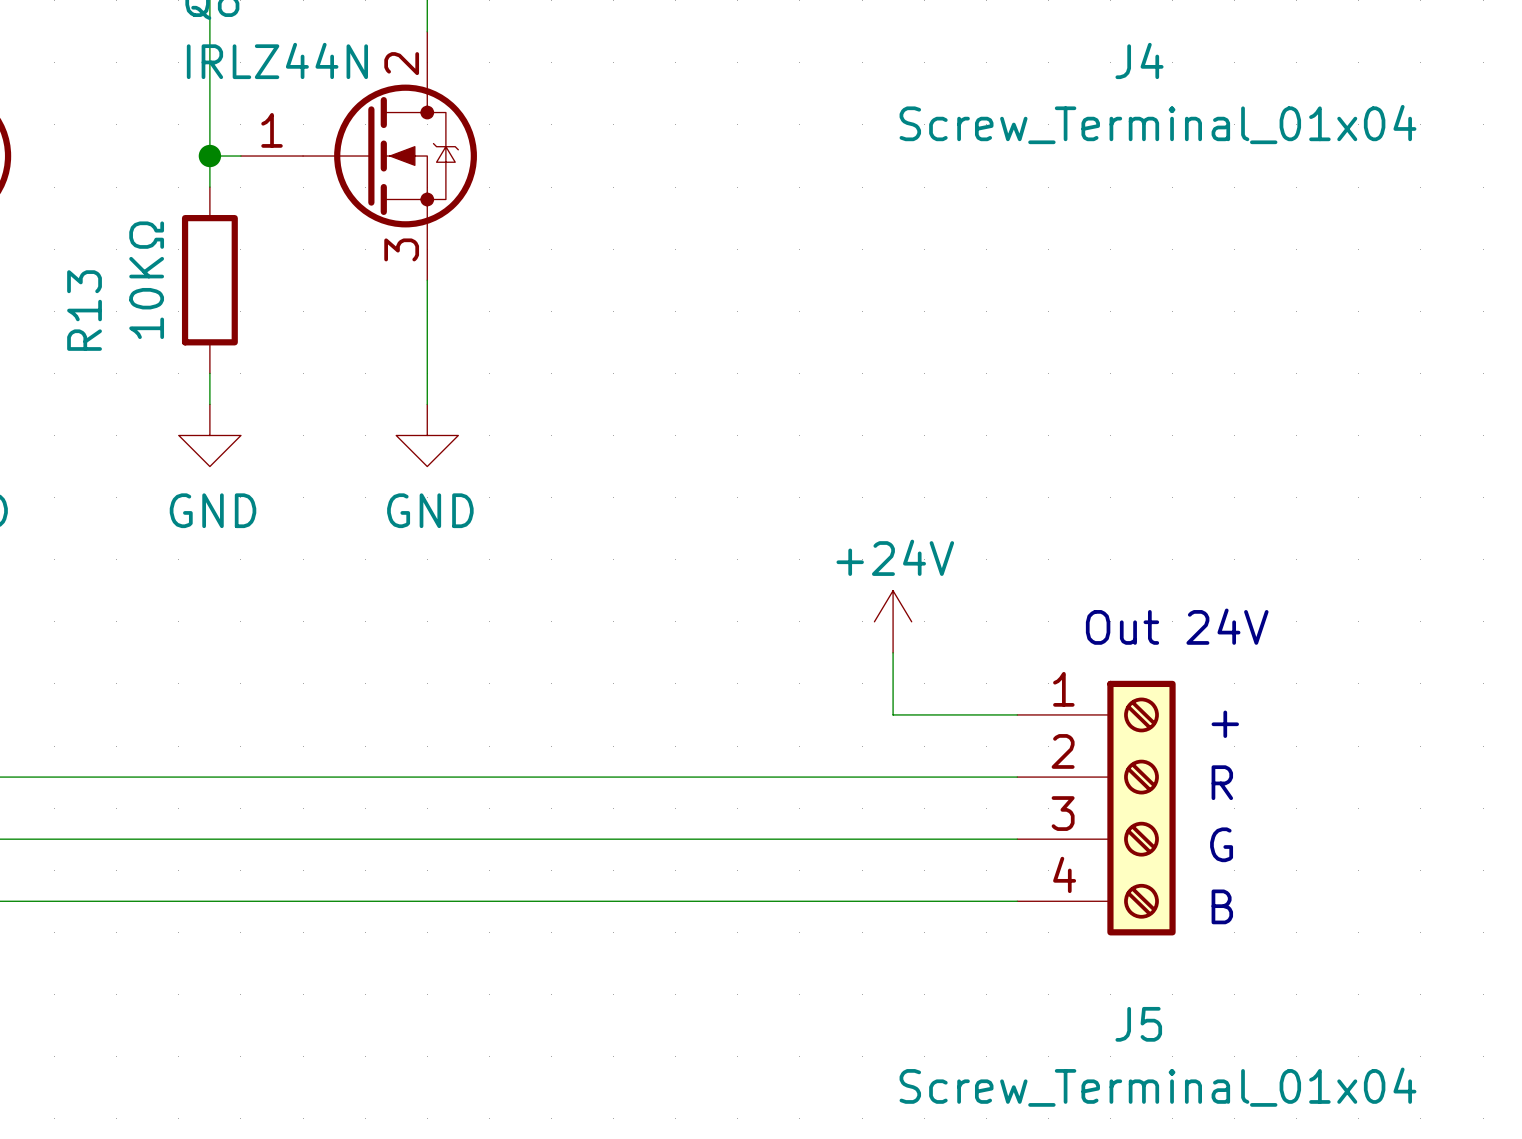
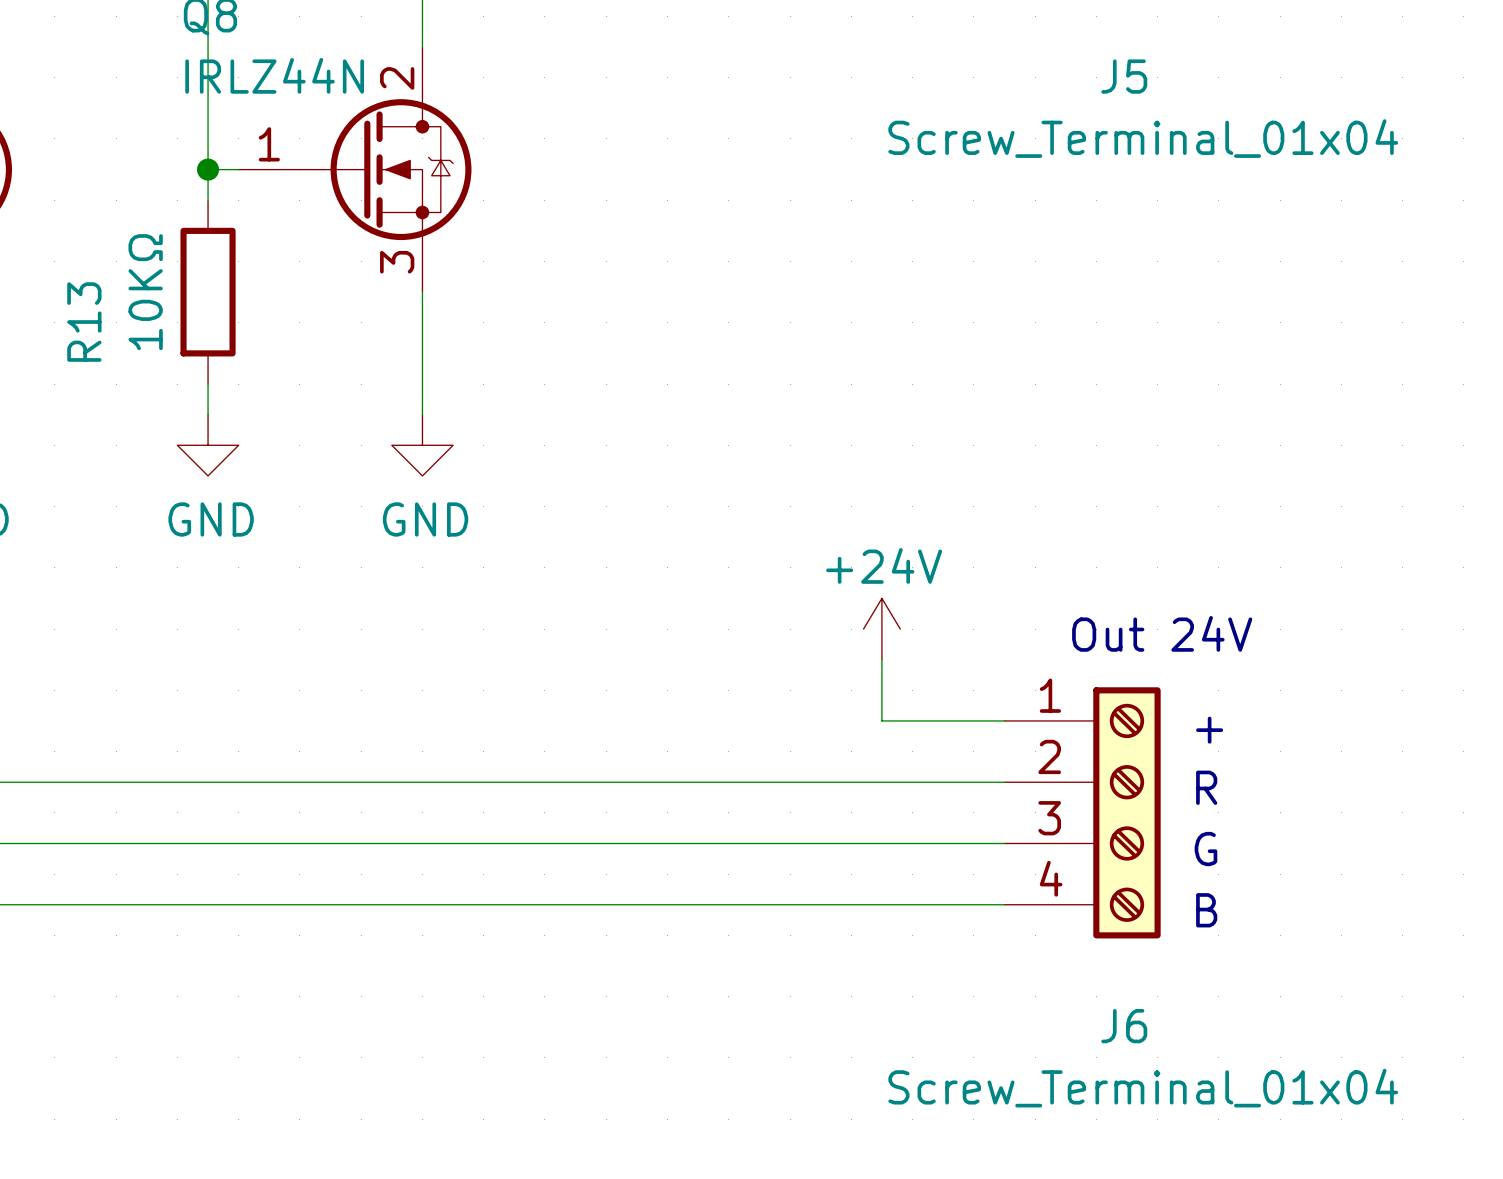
J4 name: J4 (1139, 60) -> J5 (1124, 76)
J5 name: J5 (1138, 1024) -> J6 (1124, 1026)

